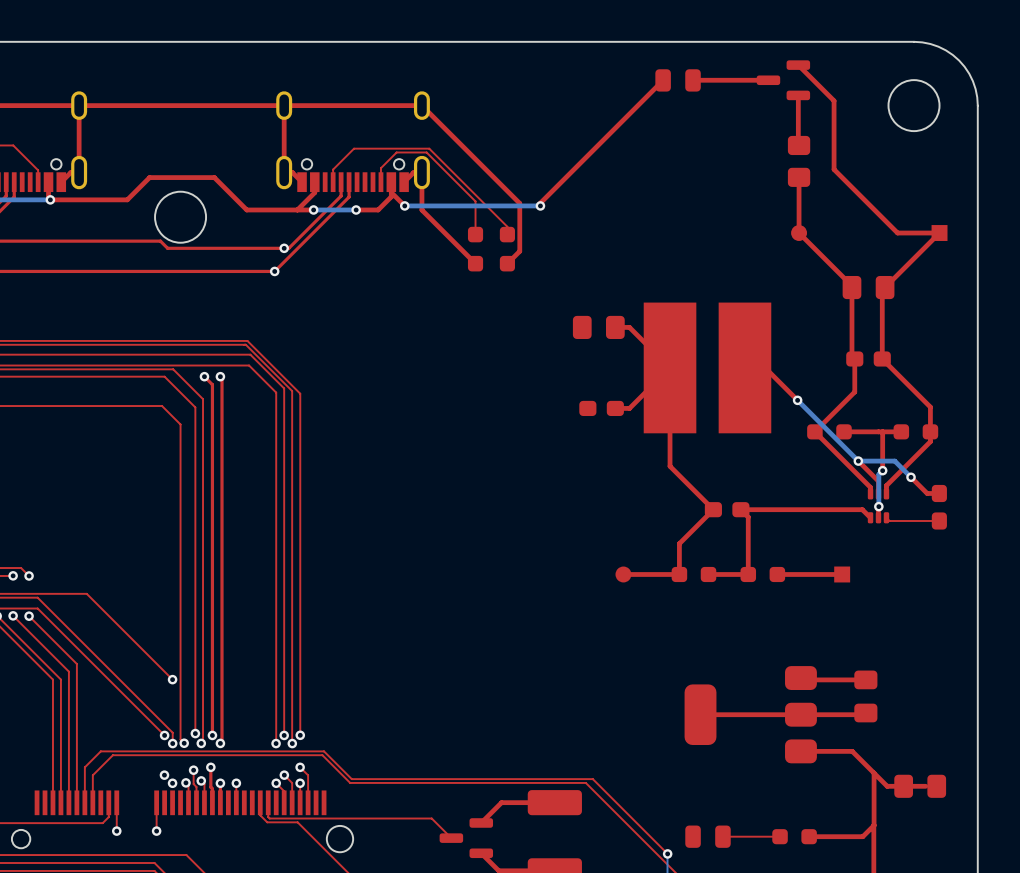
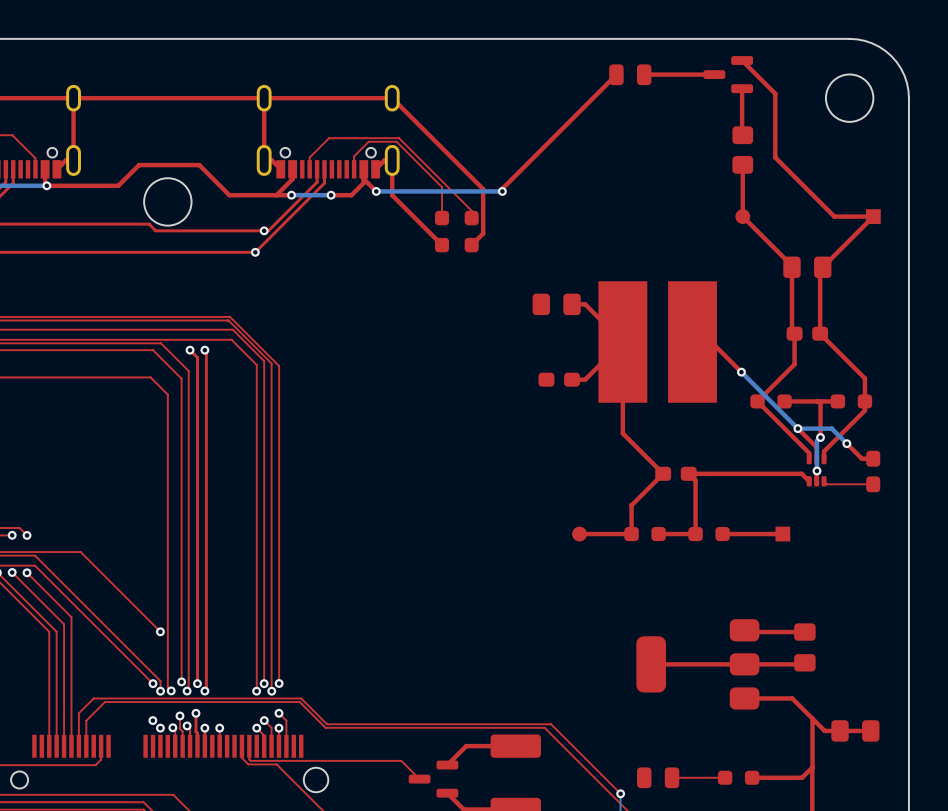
top track: (116, 802) (116, 831) -> none
top track: (156, 802) (156, 831) -> none
via: (116, 831) -> none
via: (156, 831) -> none

